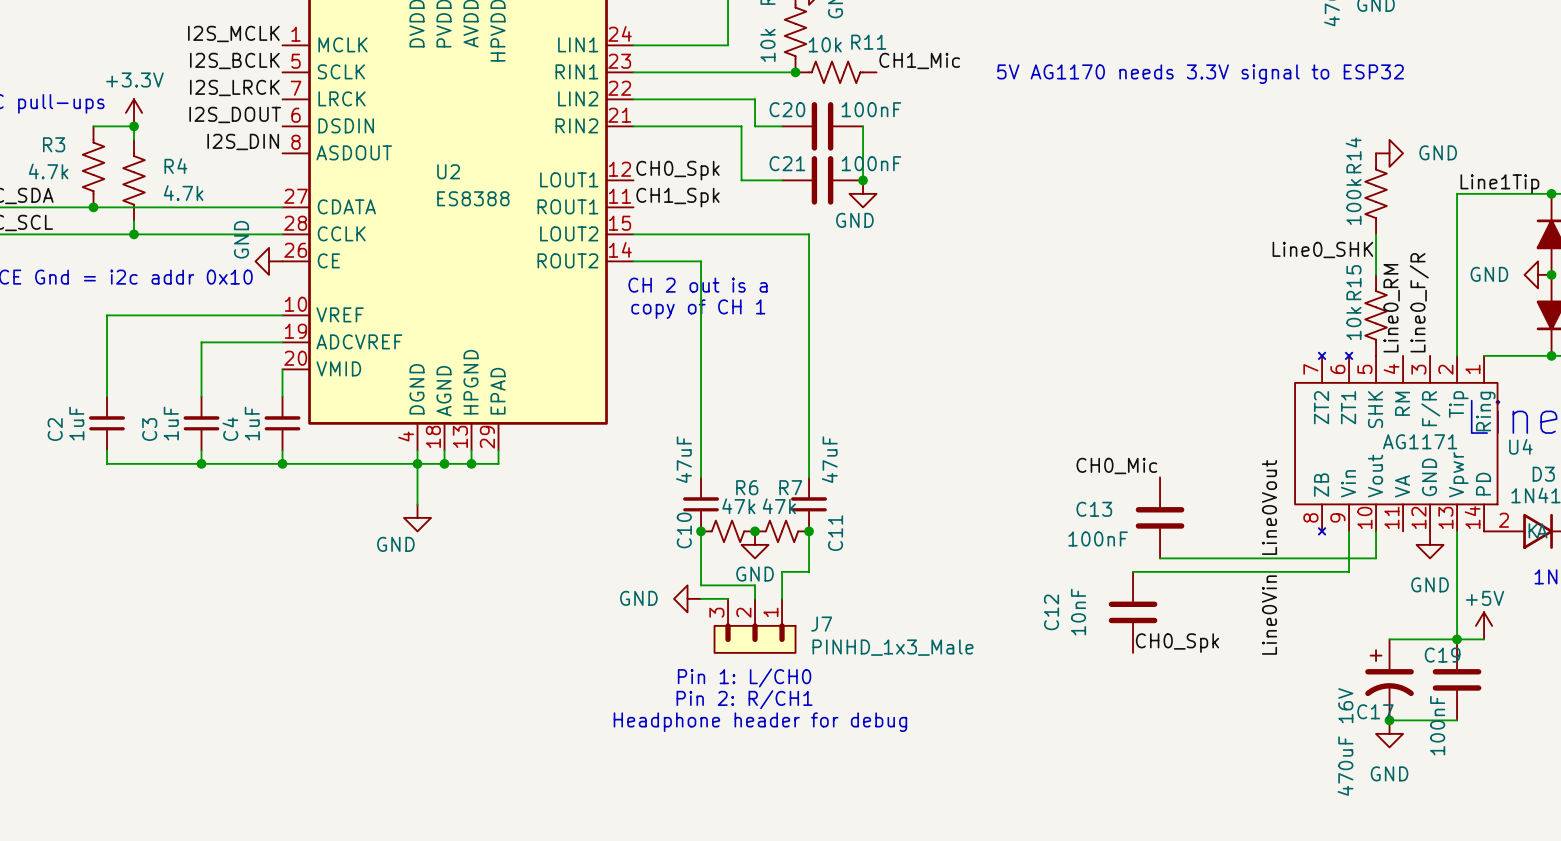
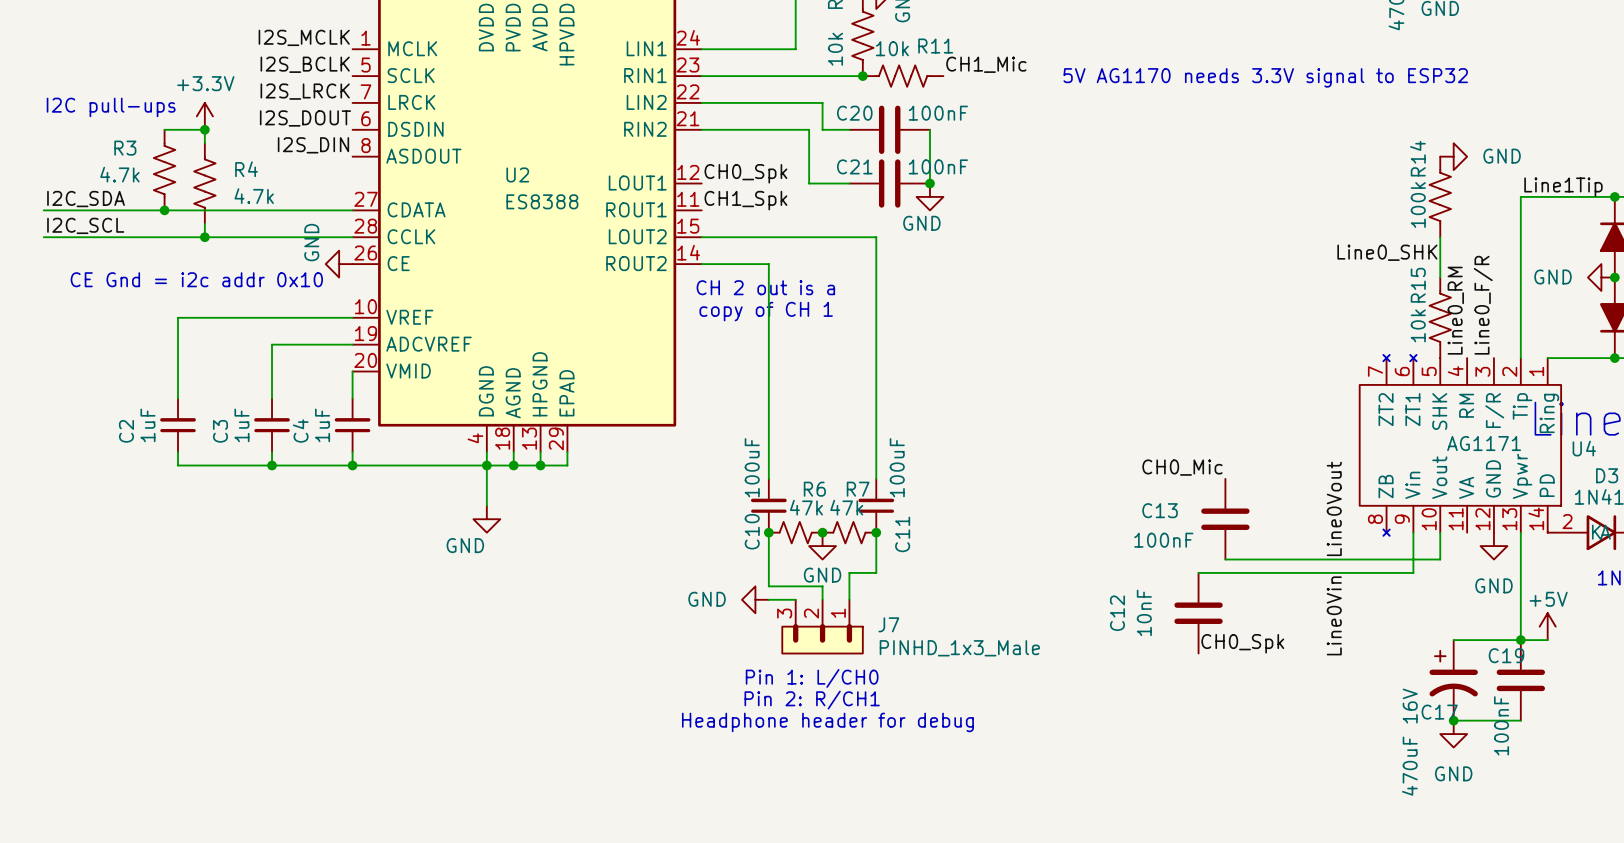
C10 value: 47uF (683, 459) -> 100uF (752, 467)
C11 value: 47uF (829, 459) -> 100uF (897, 467)

